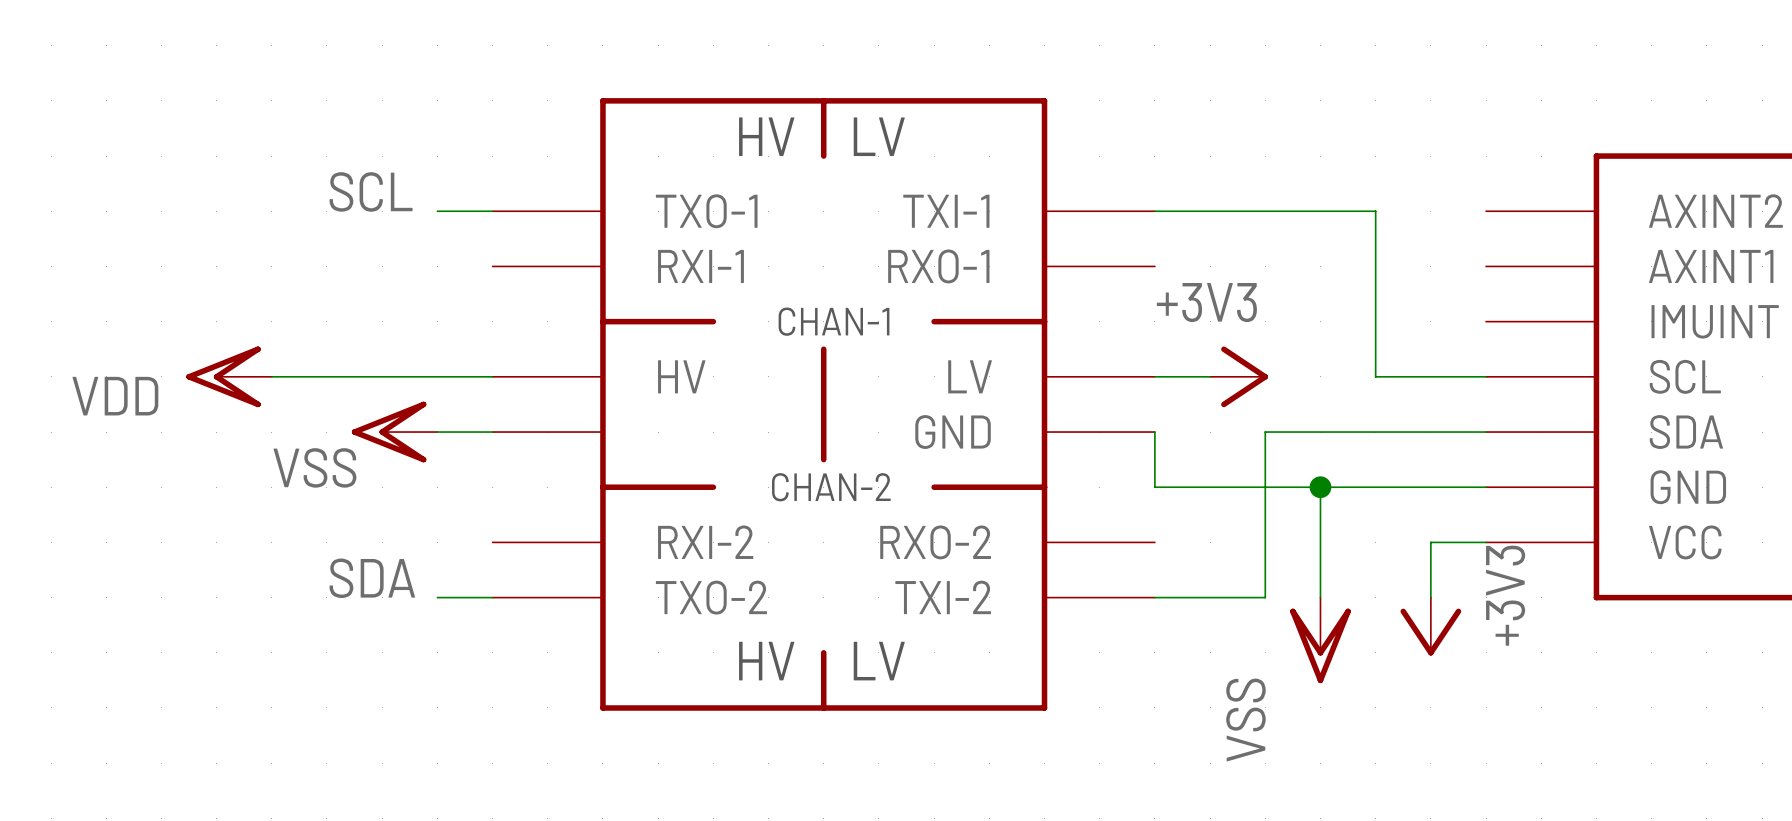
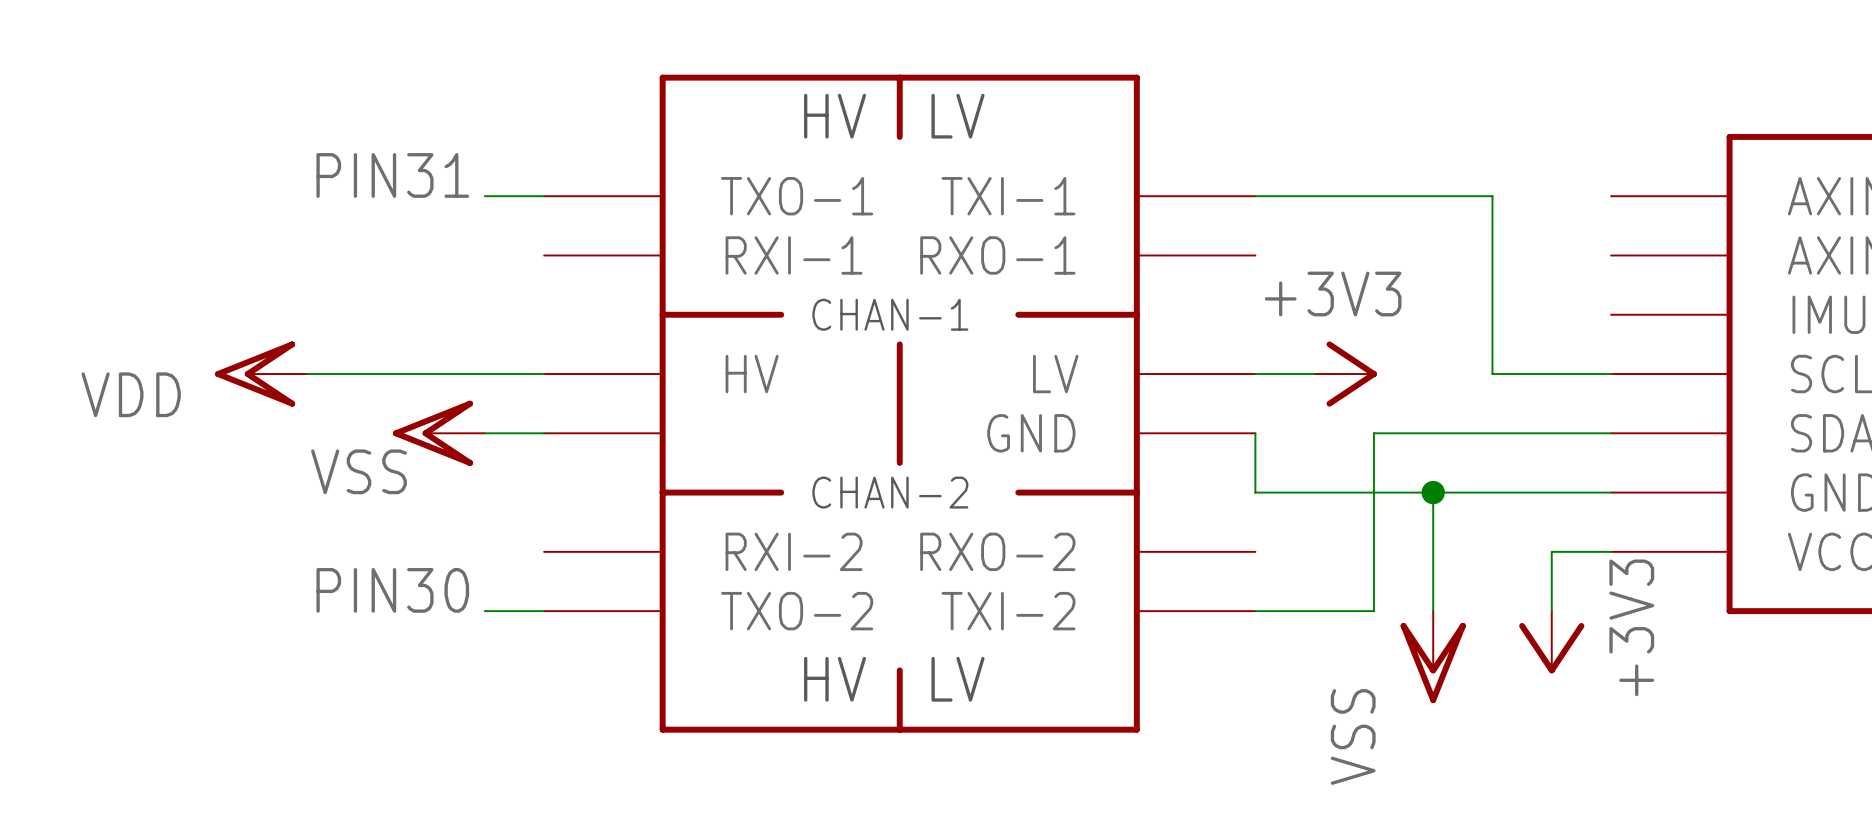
label: SCL (371, 191) -> none
label: none -> PIN31 (392, 175)
label: none -> PIN30 (392, 590)
label: SDA (372, 578) -> none

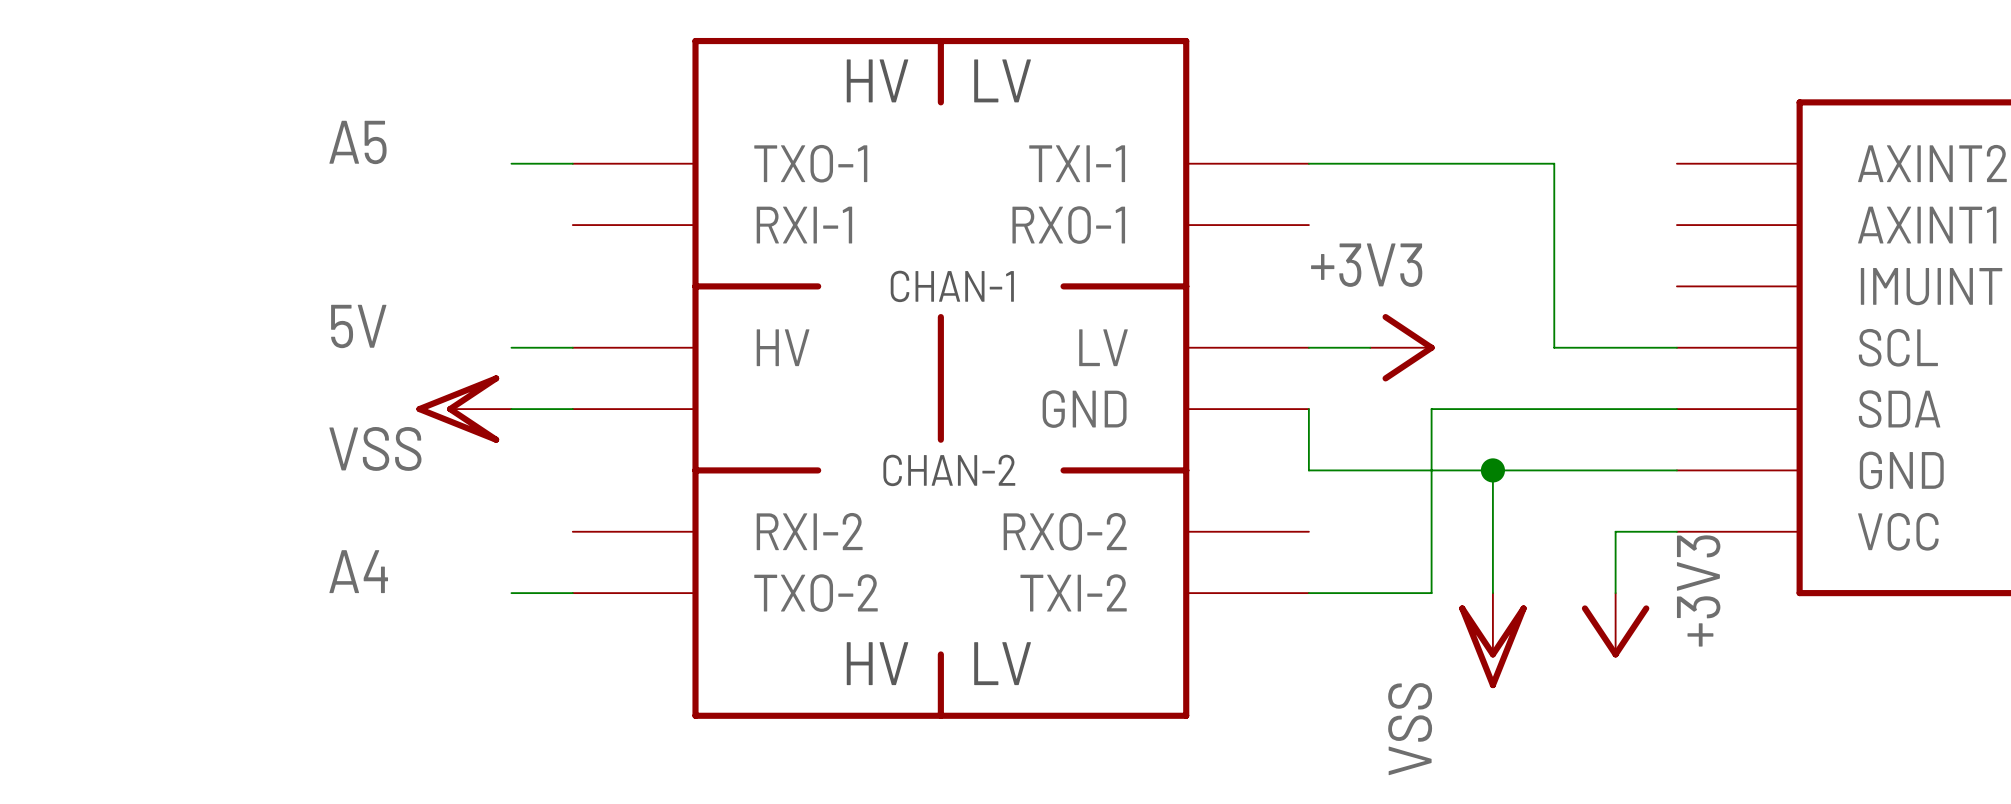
label: PIN31 (392, 175) -> A5 (357, 142)
label: none -> 5V (358, 326)
power symbol: VDD (261, 374) -> none
wire: (307, 374) (484, 374) -> none
label: PIN30 (392, 590) -> A4 (358, 571)

